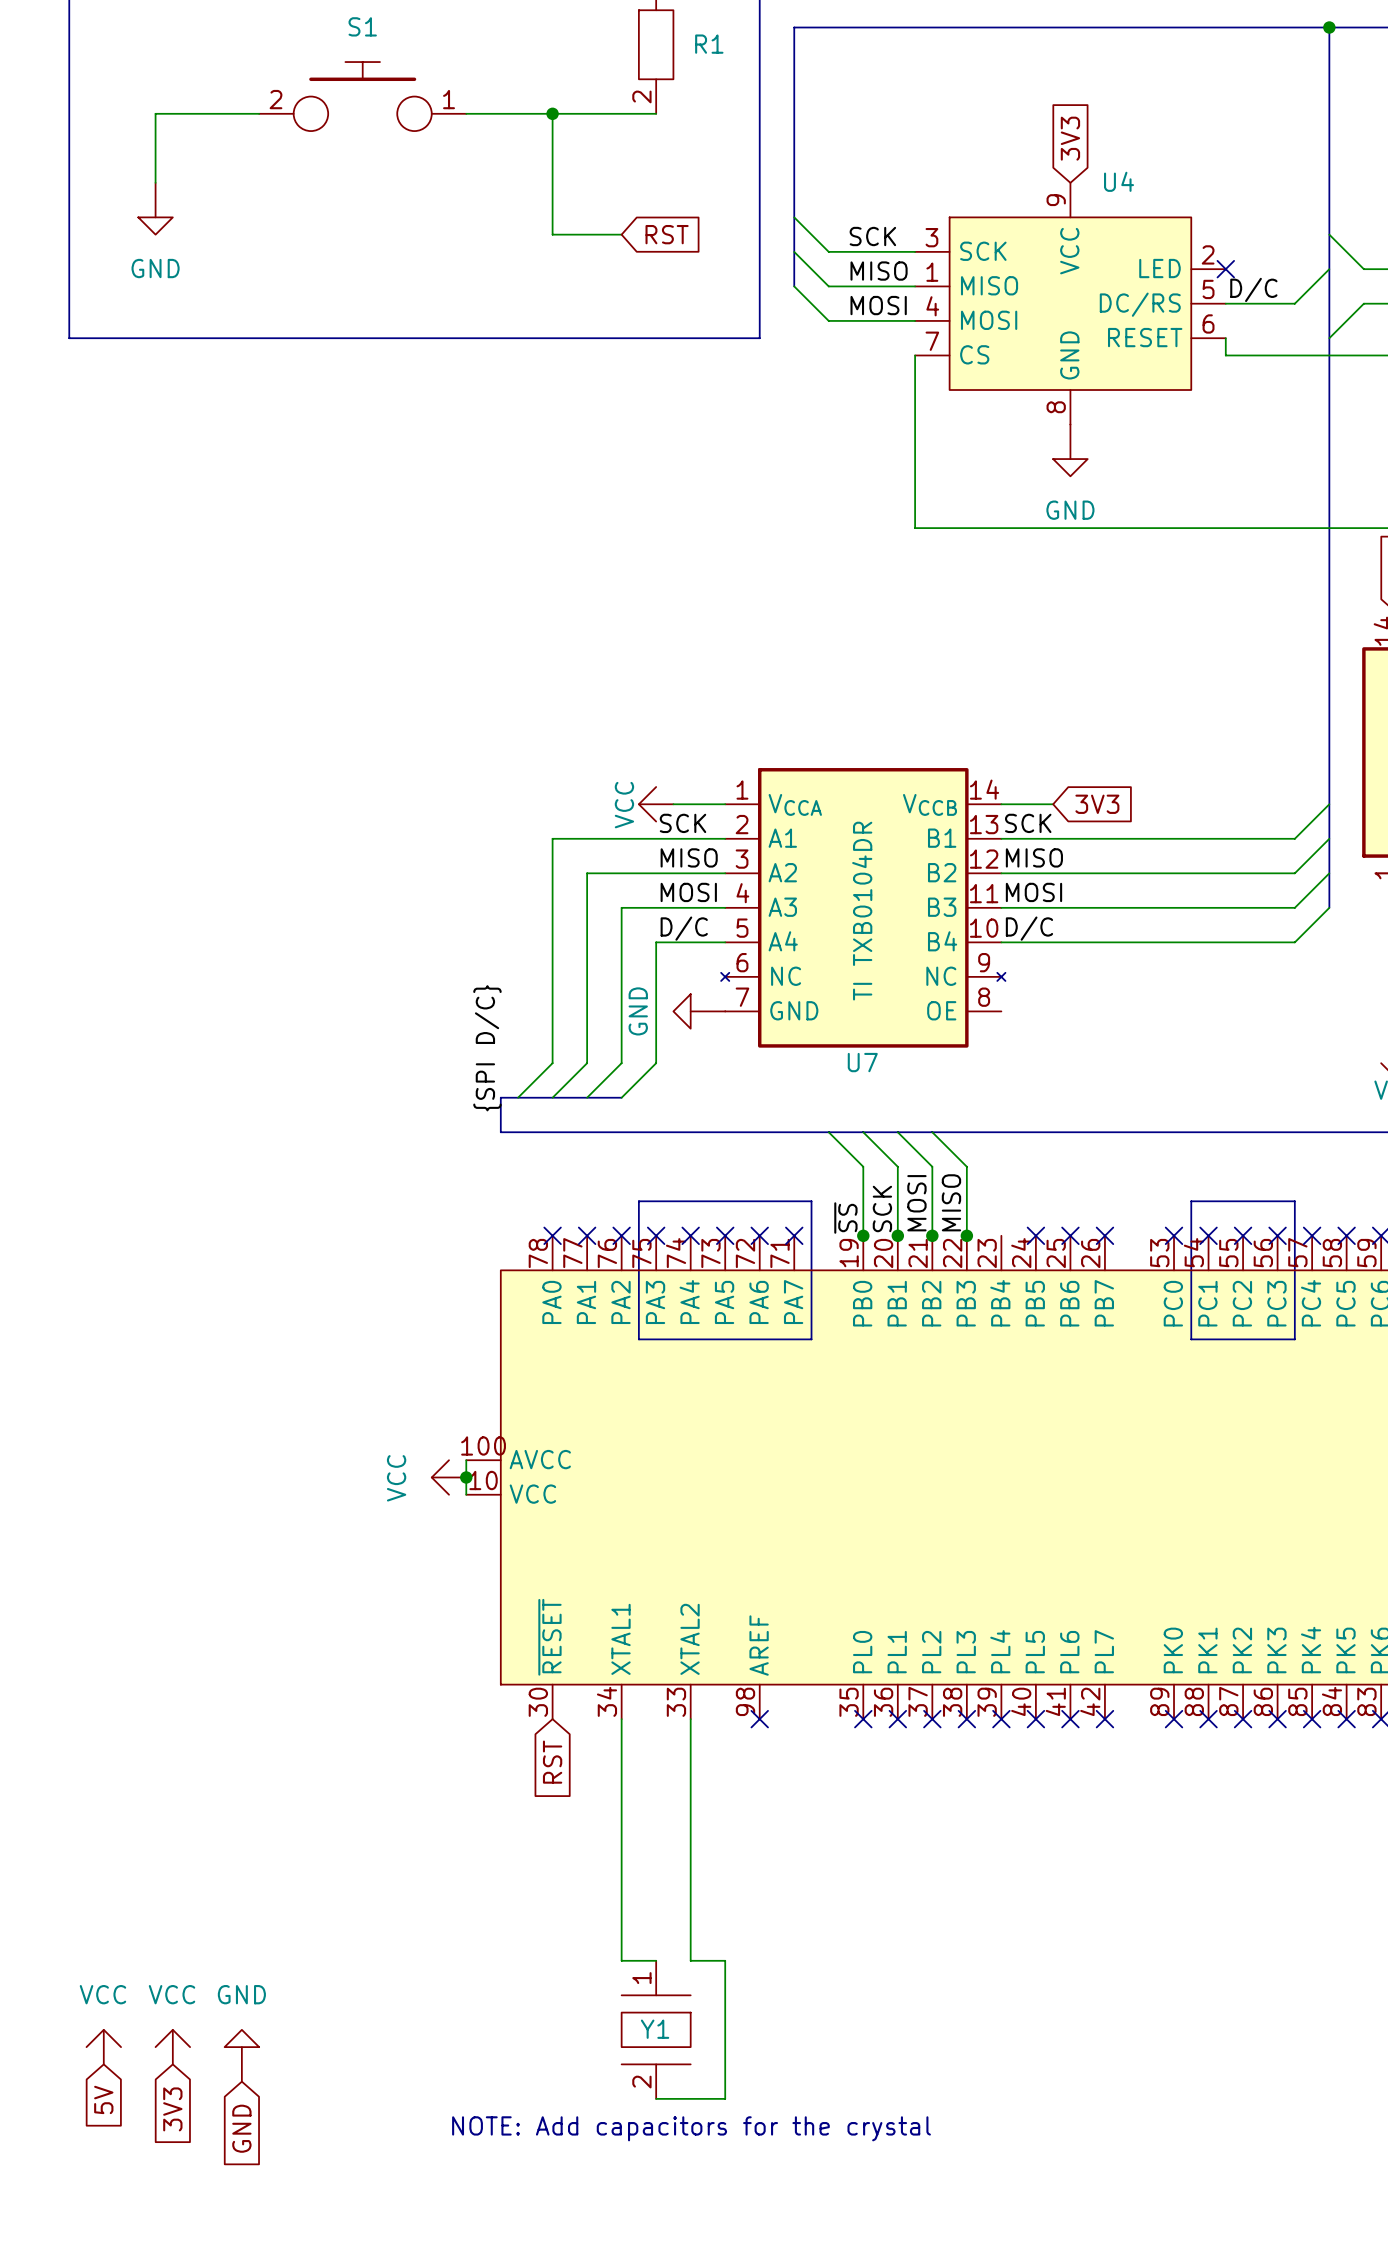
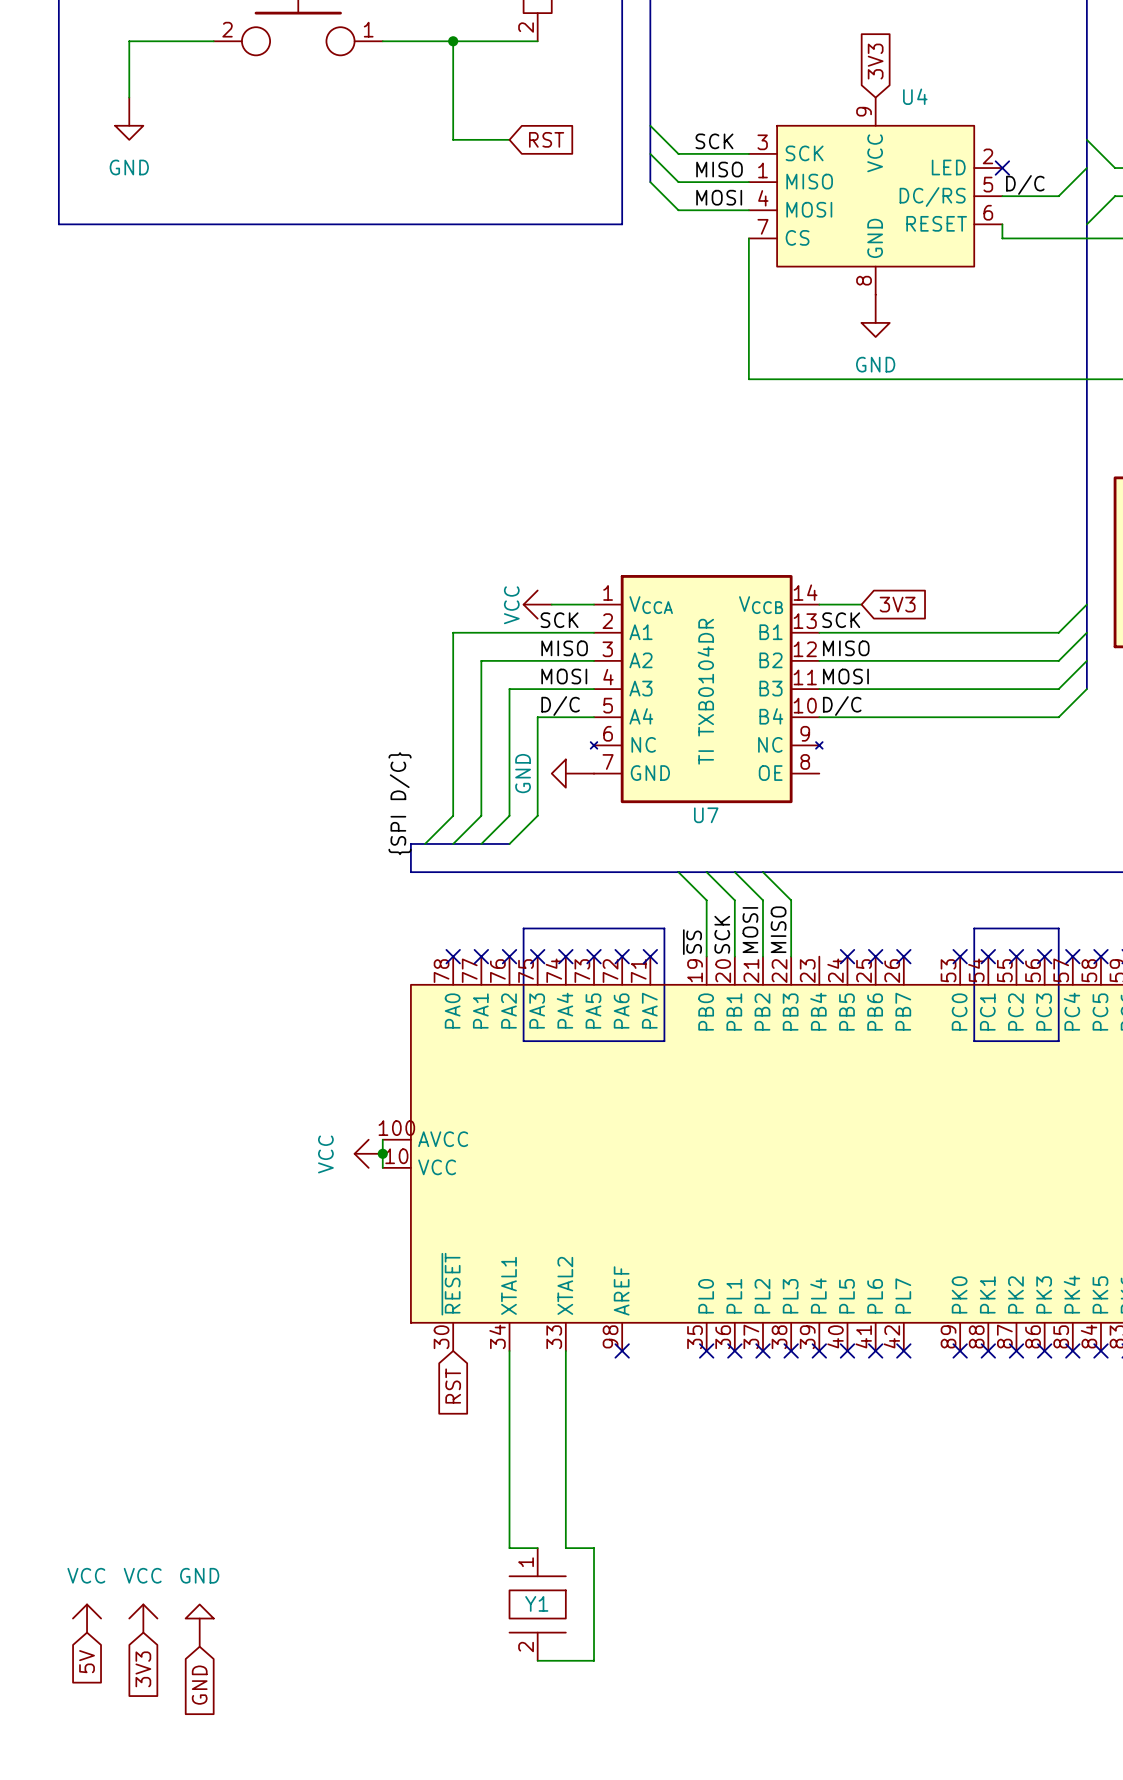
junction: (863, 1235) -> none
junction: (897, 1235) -> none
junction: (932, 1235) -> none
junction: (966, 1235) -> none
text: NOTE: Add capacitors for the crystal (691, 2128) -> none

